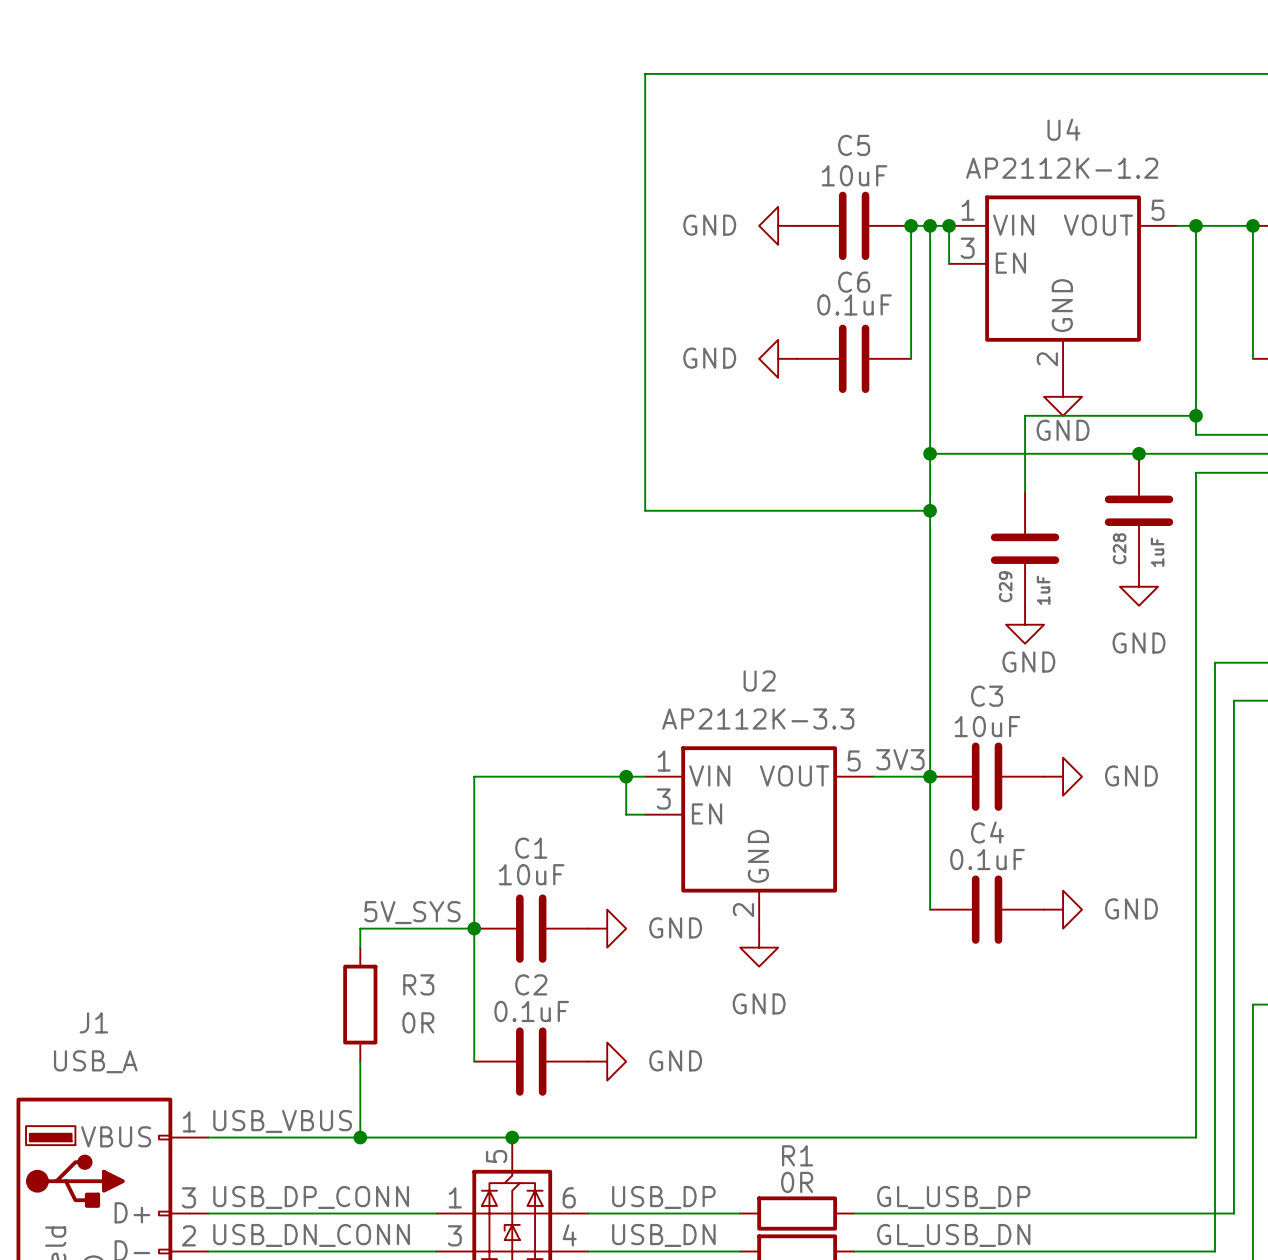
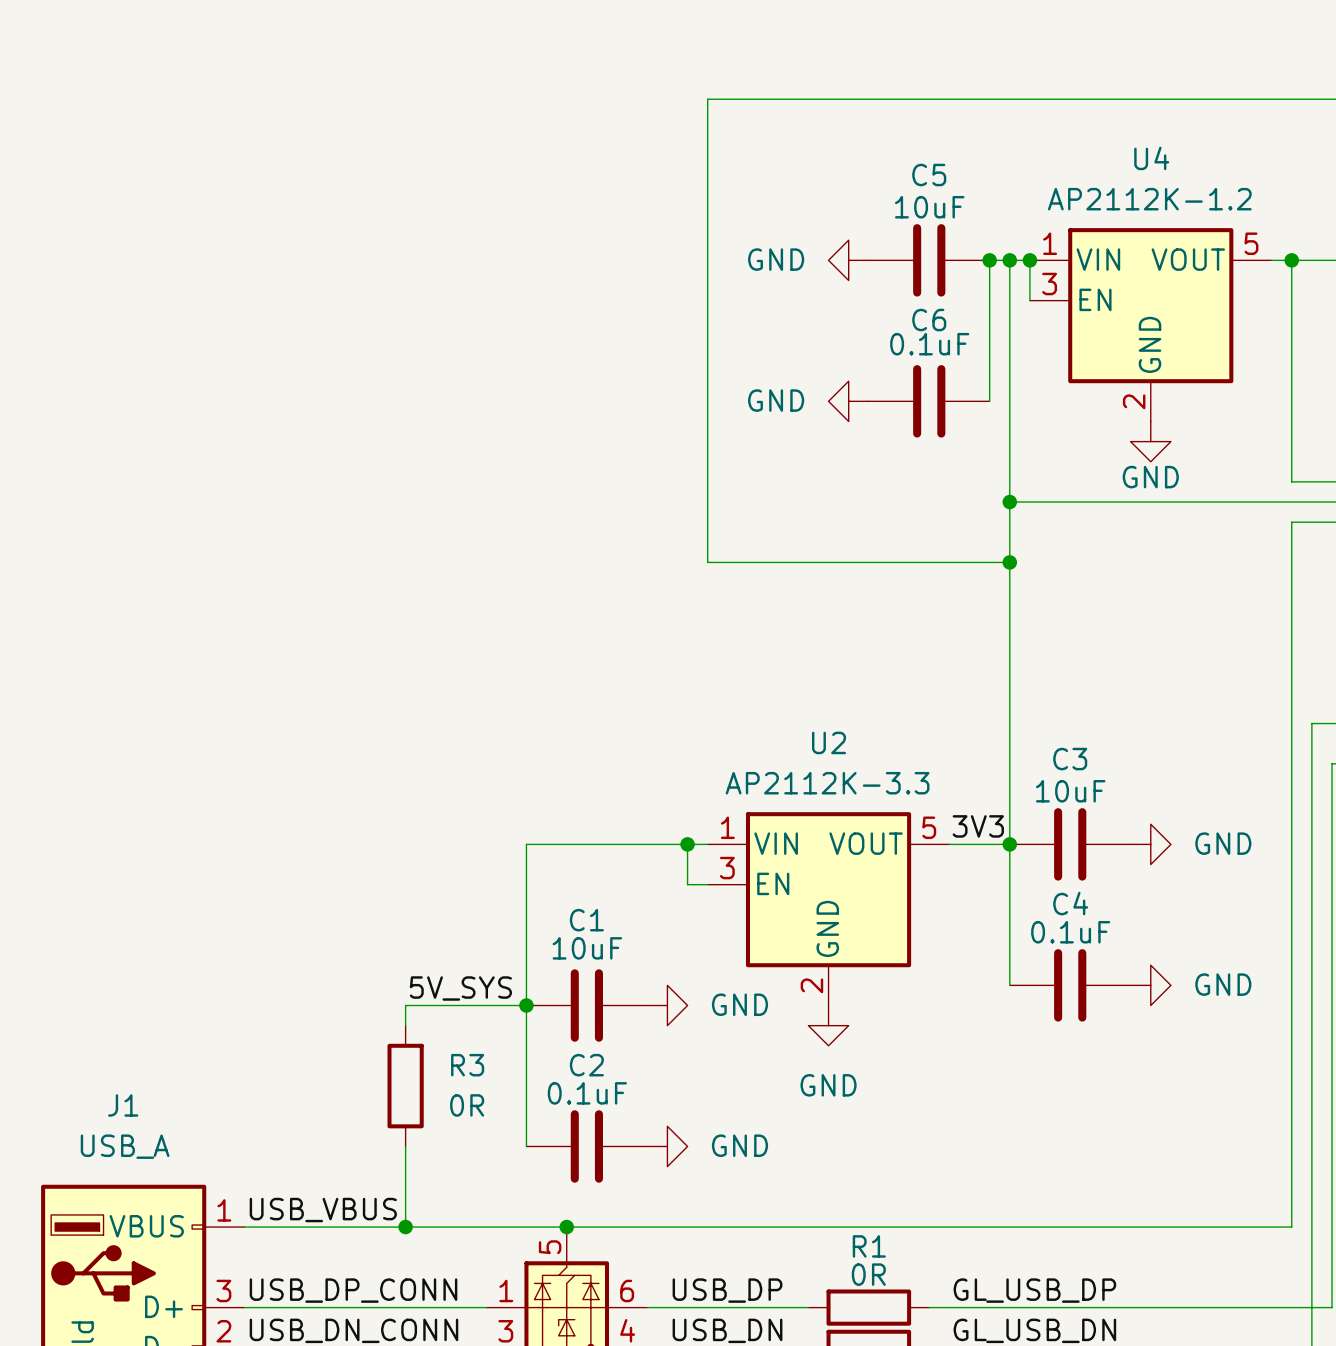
wire: (1195, 415) (1025, 415) (1025, 491) -> none
junction: (1195, 415) -> none
junction: (1139, 453) -> none
C28: 1uF (1139, 510) -> none
C29: 1uF (1025, 548) -> none
power symbol: GND (1139, 586) -> none
power symbol: GND (1025, 624) -> none

